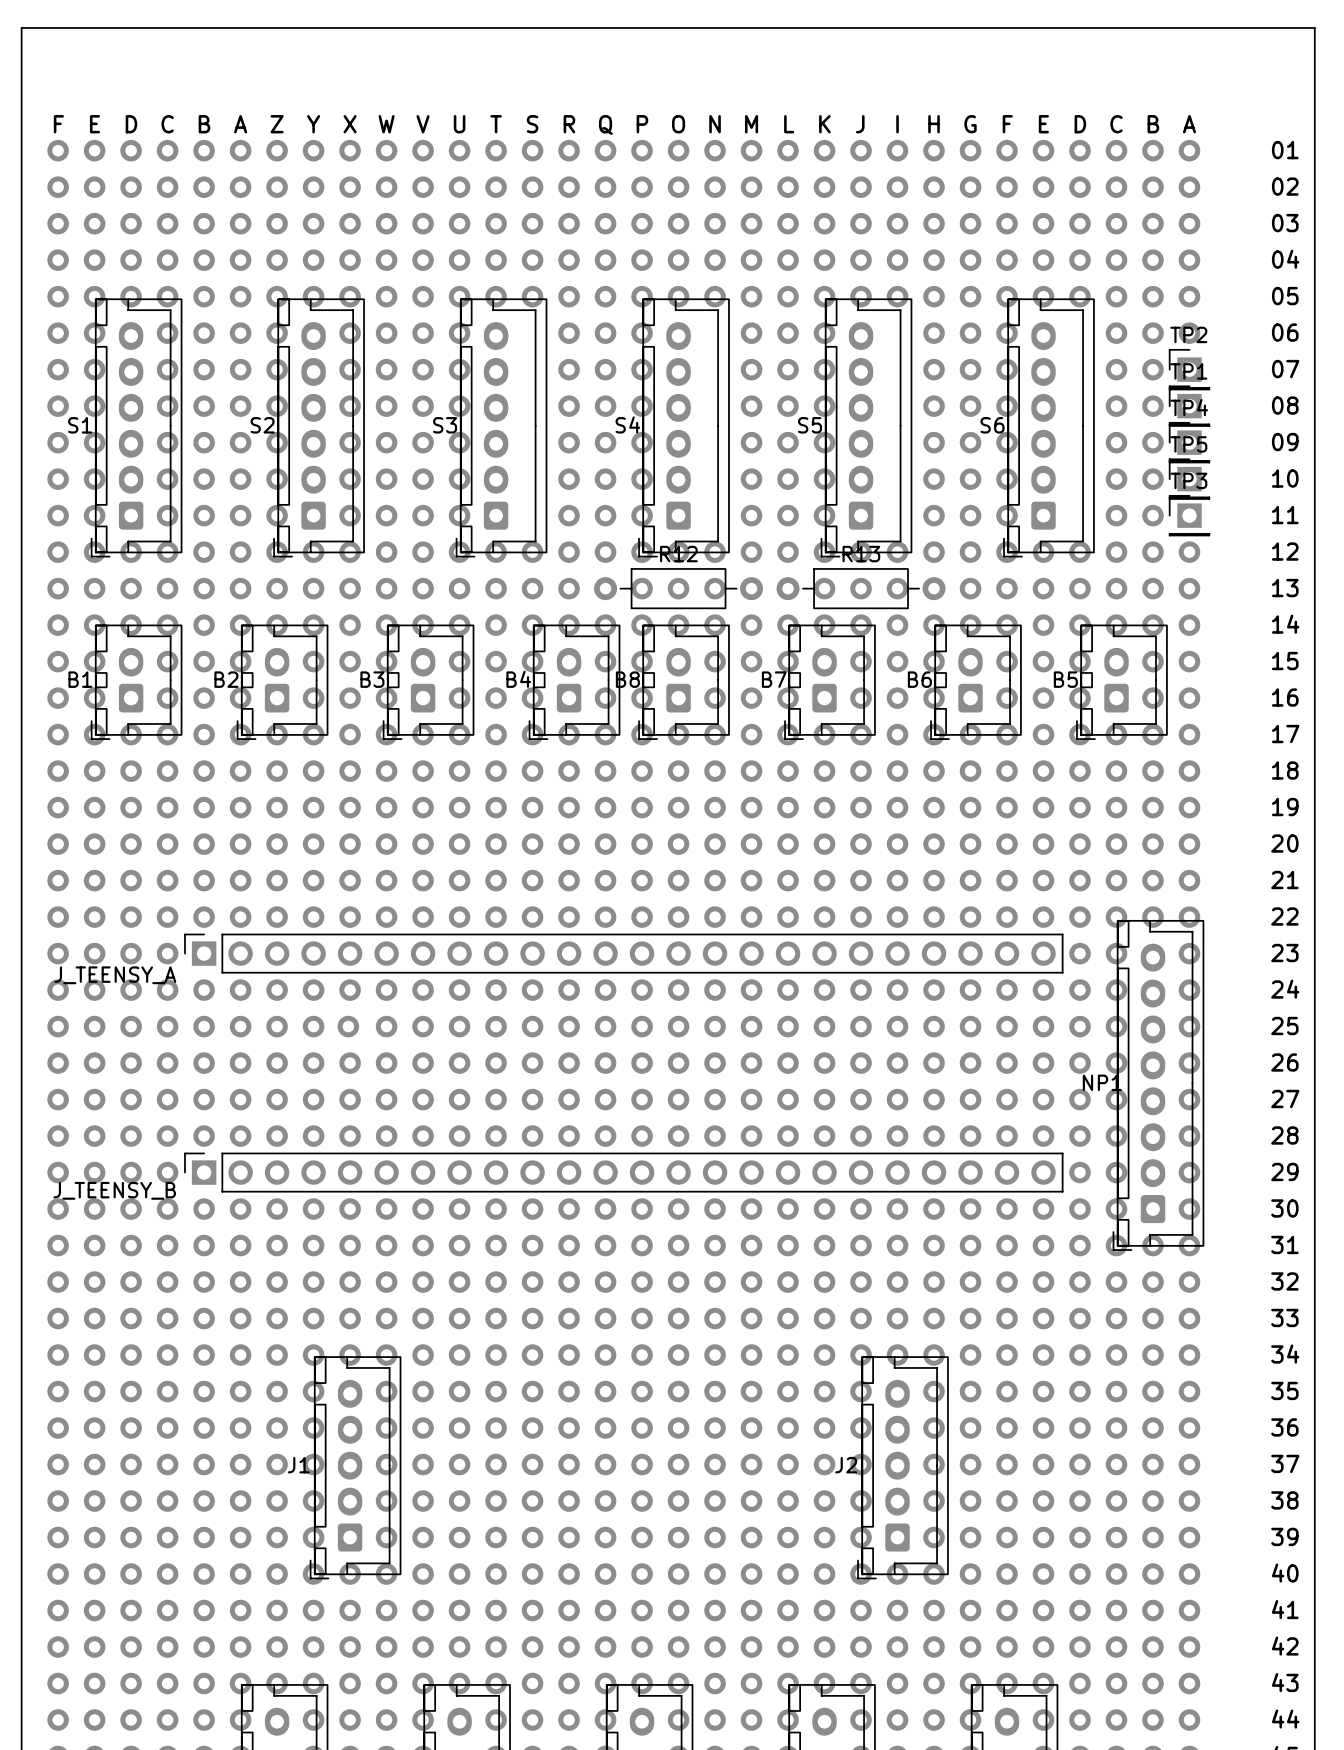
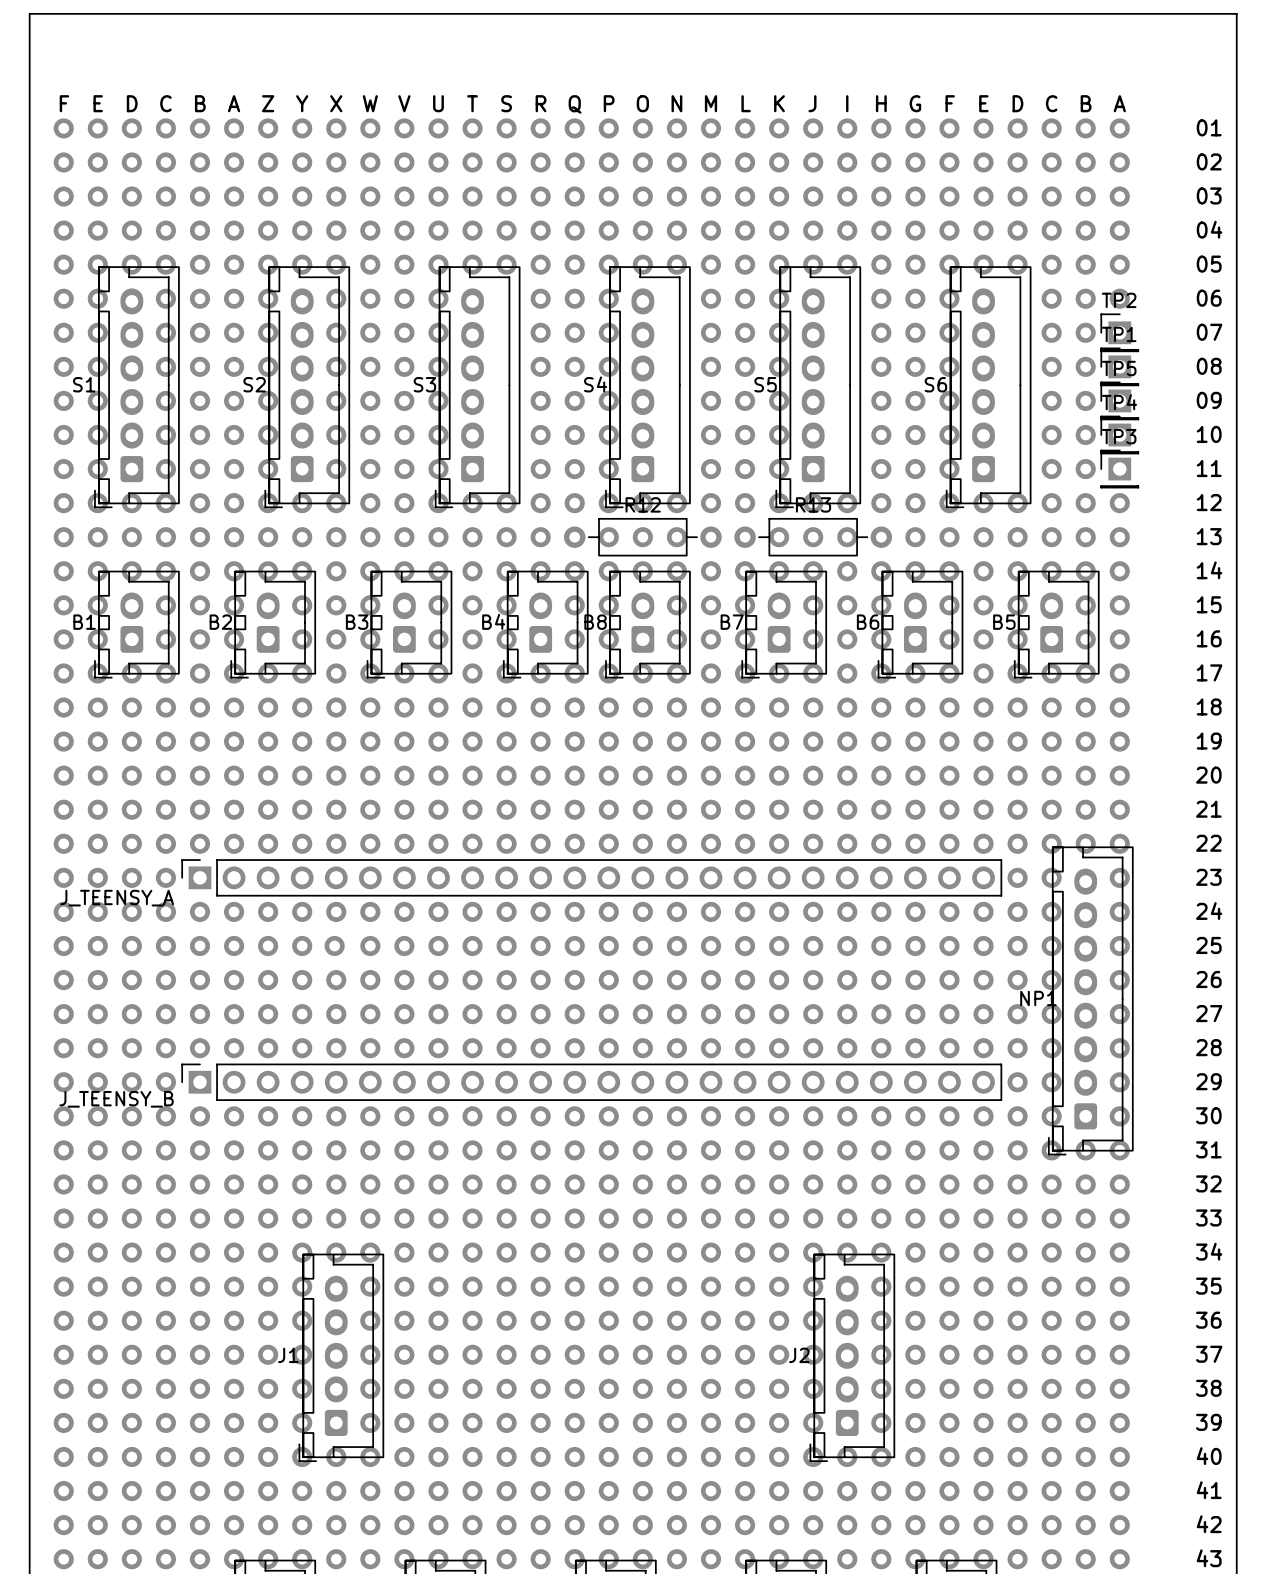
TP4 name: TP4 (1189, 407) -> TP5 (1119, 368)
TP5 name: TP5 (1188, 444) -> TP4 (1119, 402)

